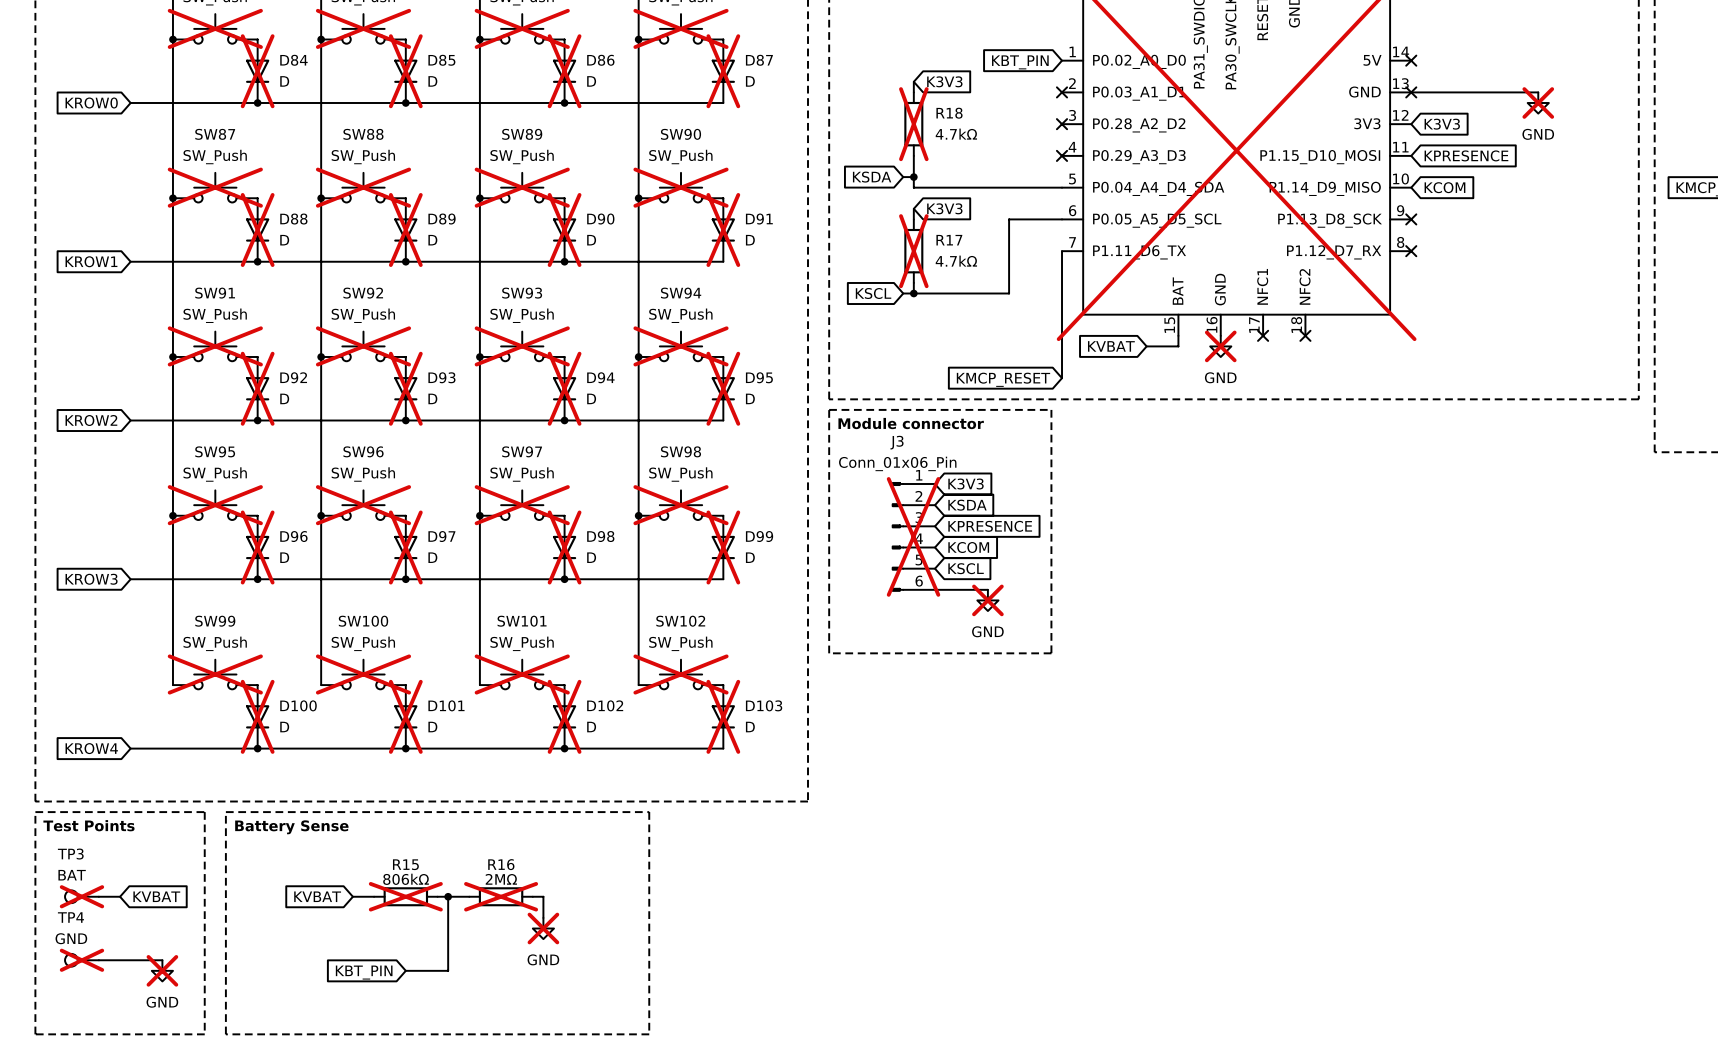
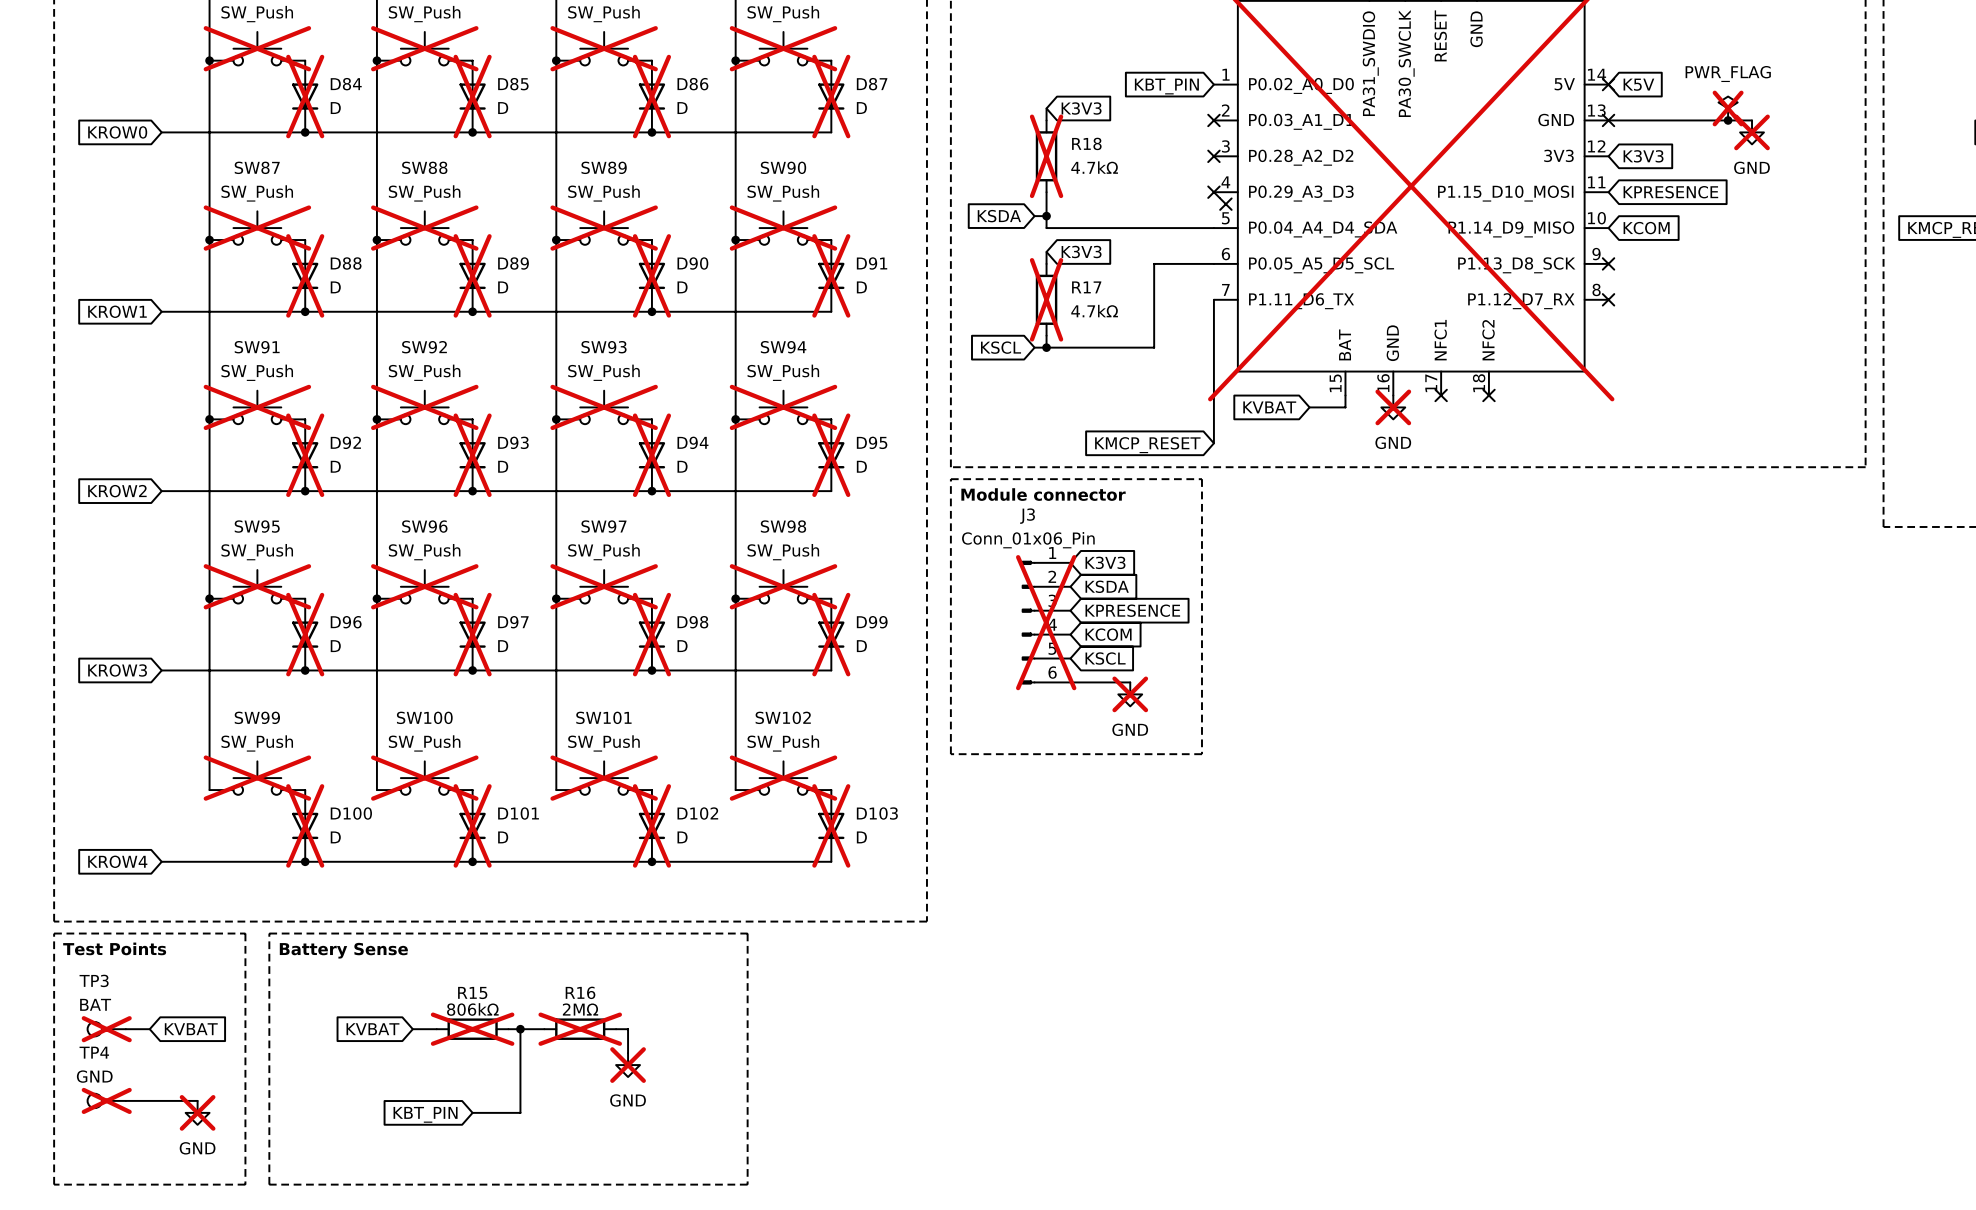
global label: none -> K5V (1638, 84)
power symbol: none -> PWR_FLAG (1728, 108)
junction: none -> (1728, 120)
no-connect mark: none -> (1225, 204)

